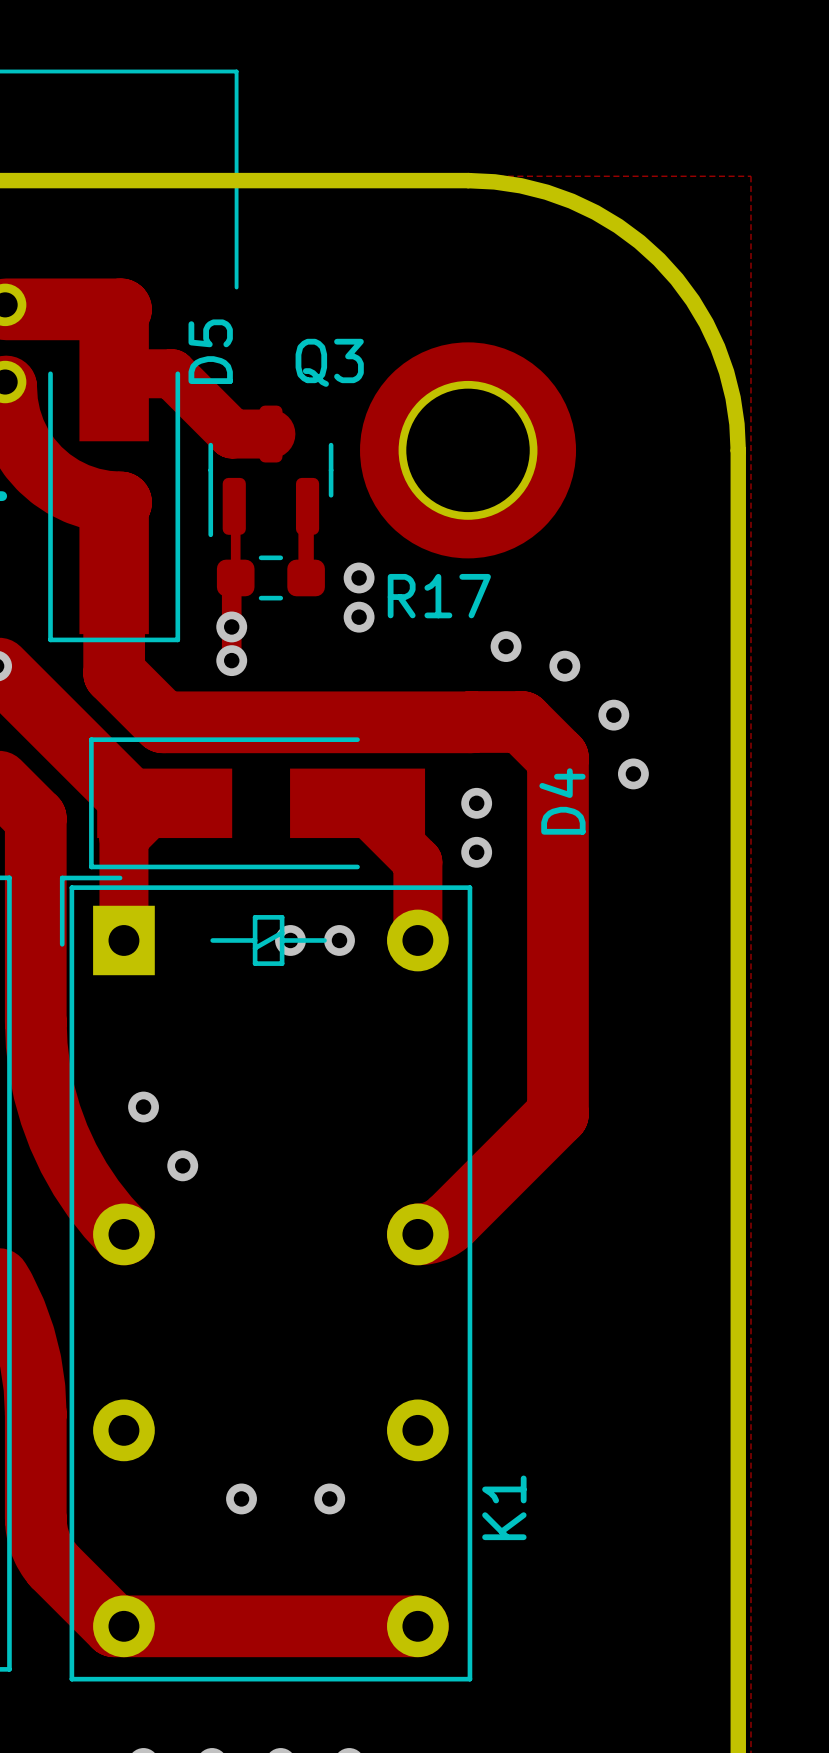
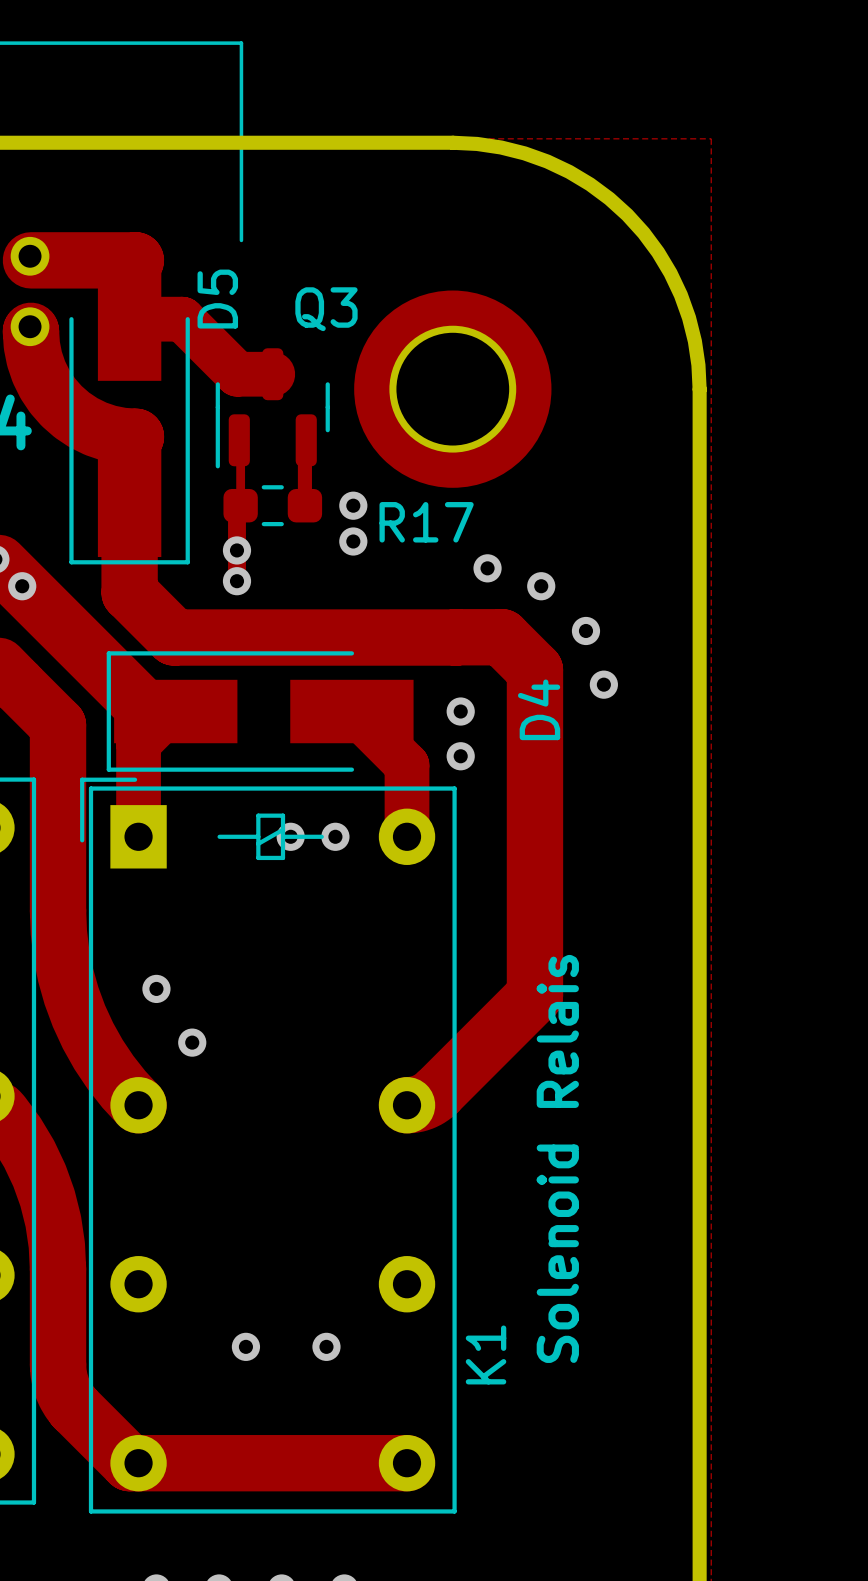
text: none -> Solenoid Relais (557, 1158)

